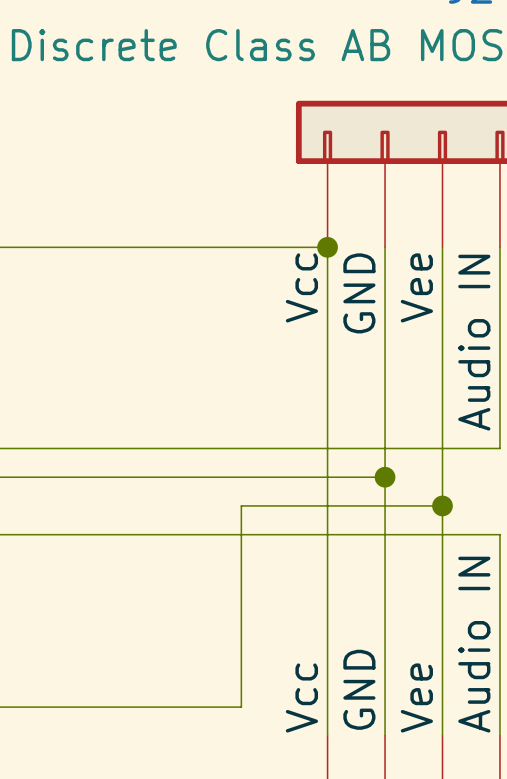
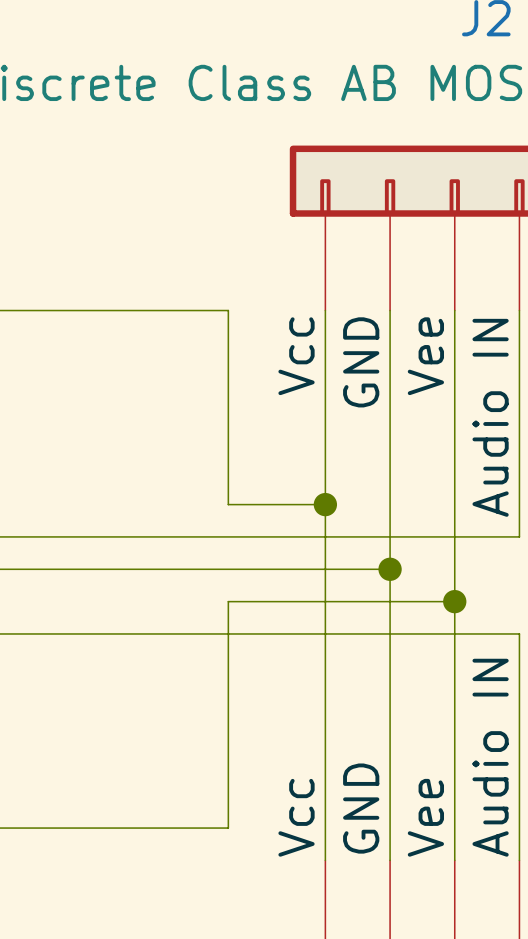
wire: (241, 247) (327, 247) -> (228, 310) (228, 504) (325, 504)
junction: (327, 247) -> none
junction: none -> (325, 504)

